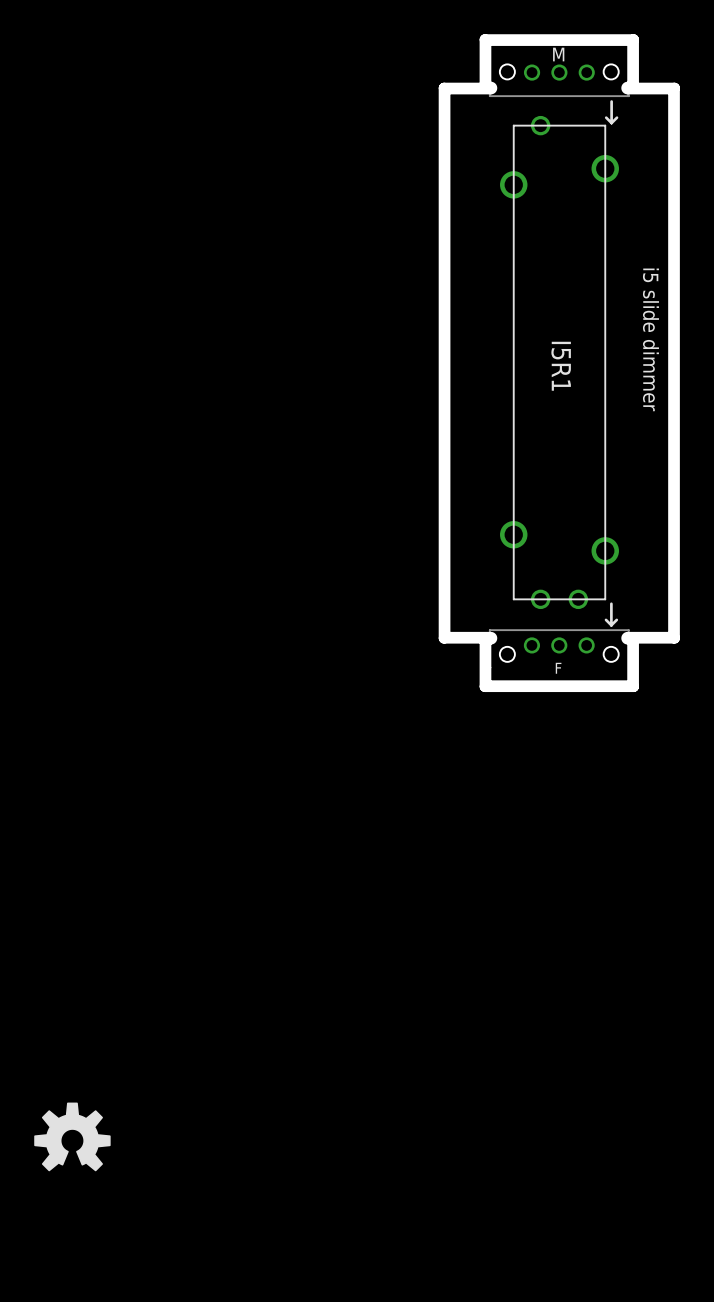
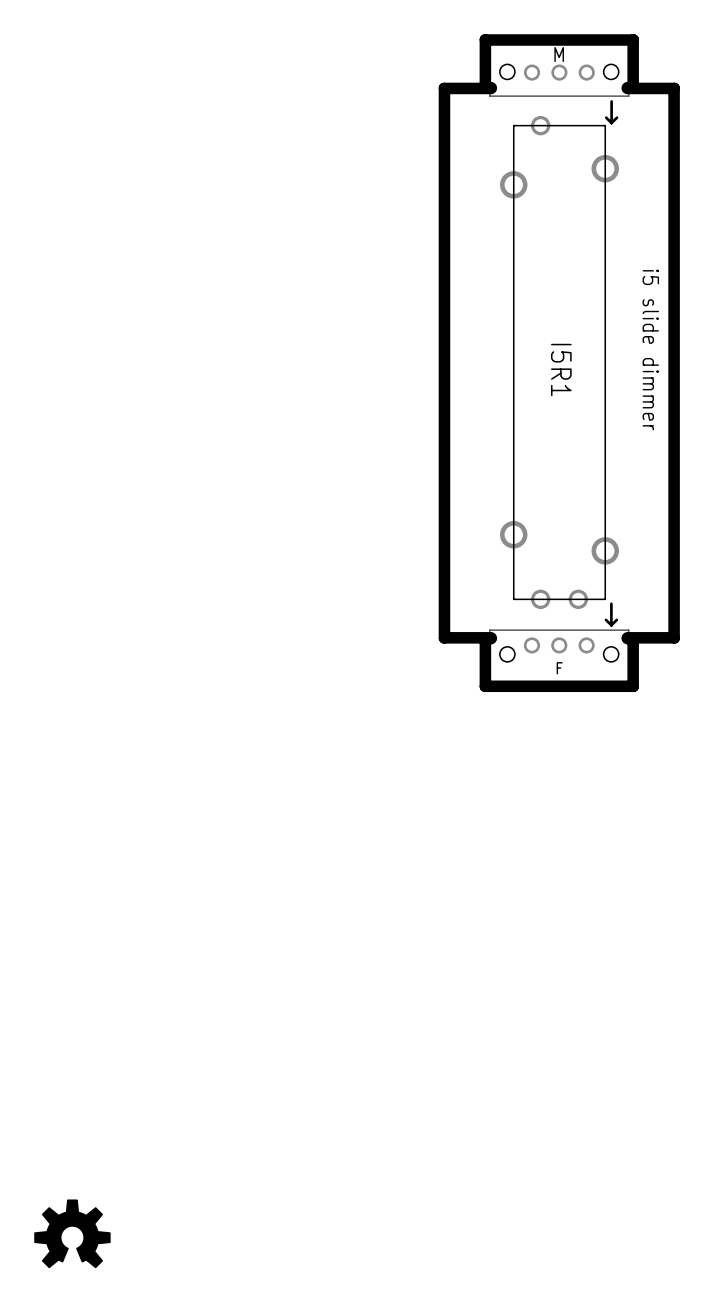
drawing position: (72, 1136) -> (72, 1233)

